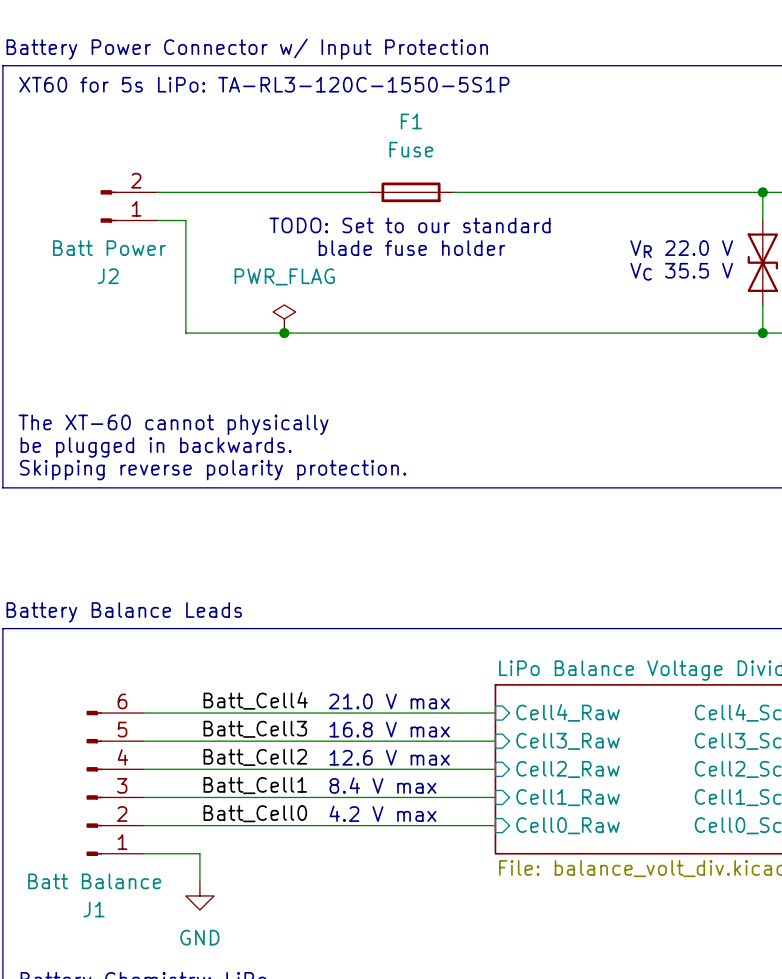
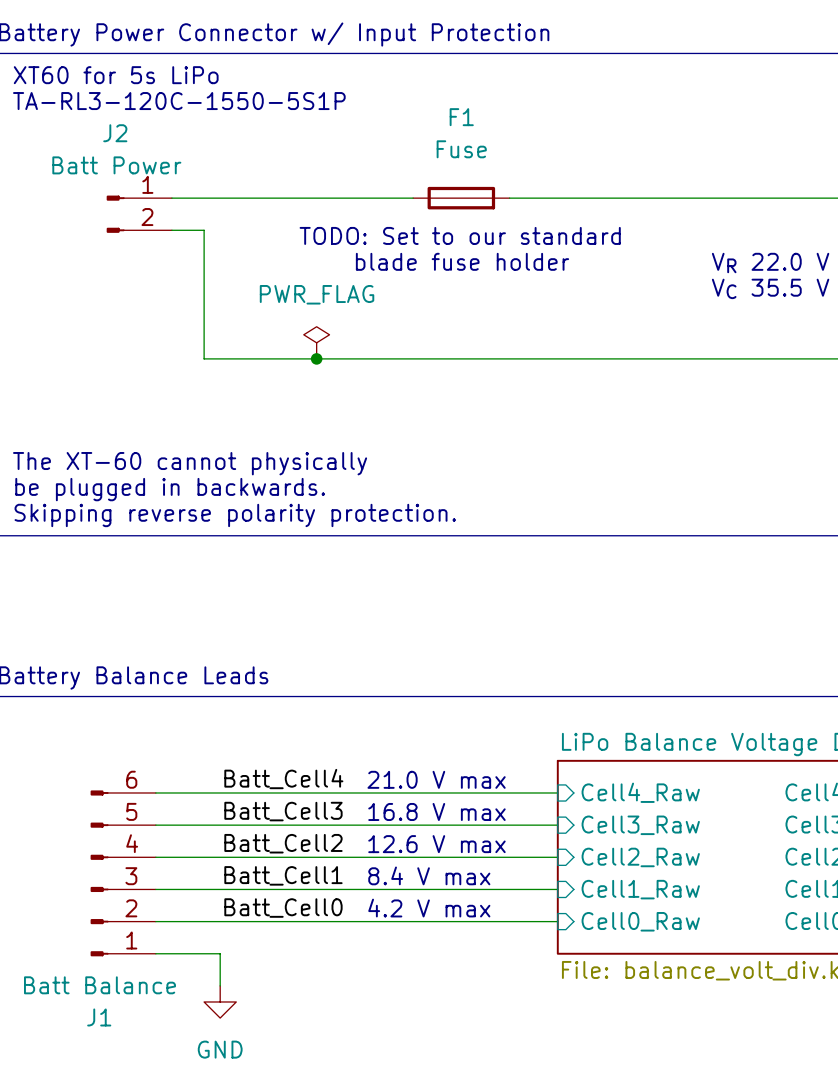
text: XT60 for 5s LiPo: TA-RL3-120C-1550-5S1P (264, 84) -> XT60 for 5s LiPo (116, 75)
text: none -> TA-RL3-120C-1550-5S1P (179, 101)
J2 flip: as is (108, 206) -> up-down (115, 214)

